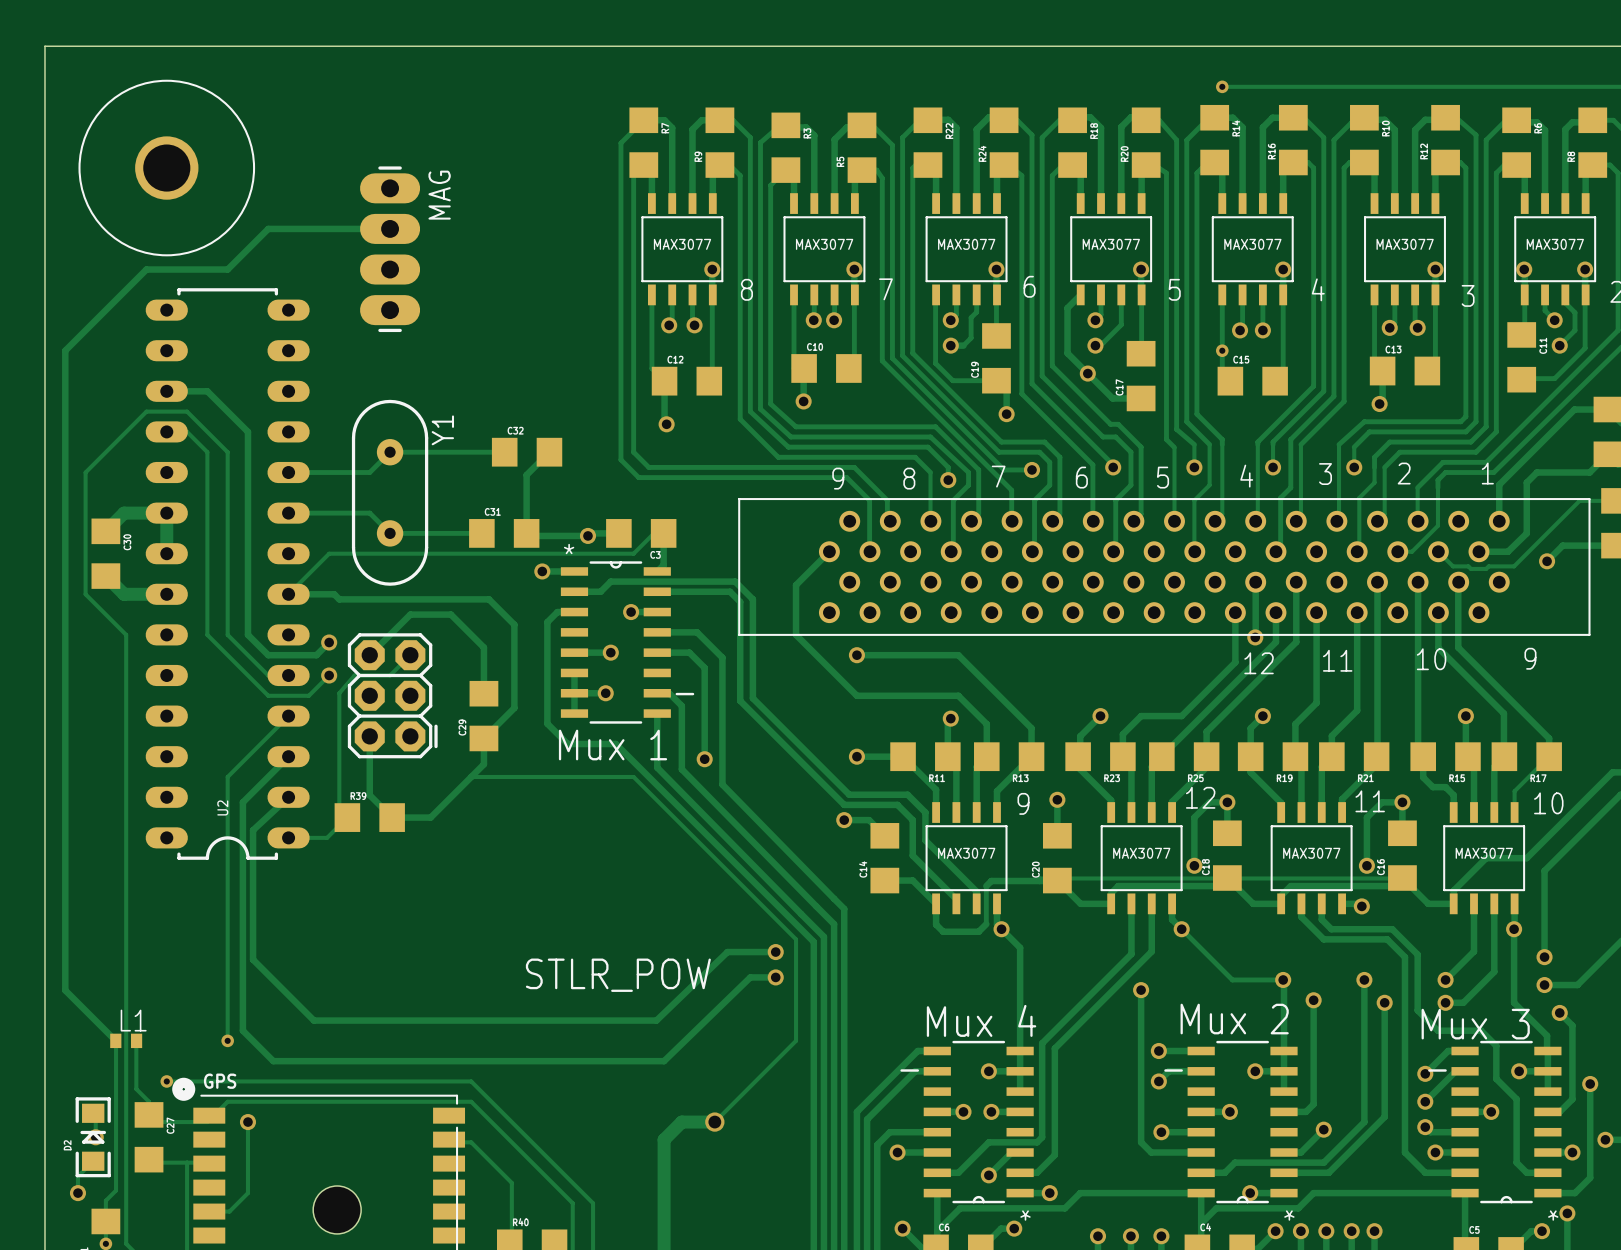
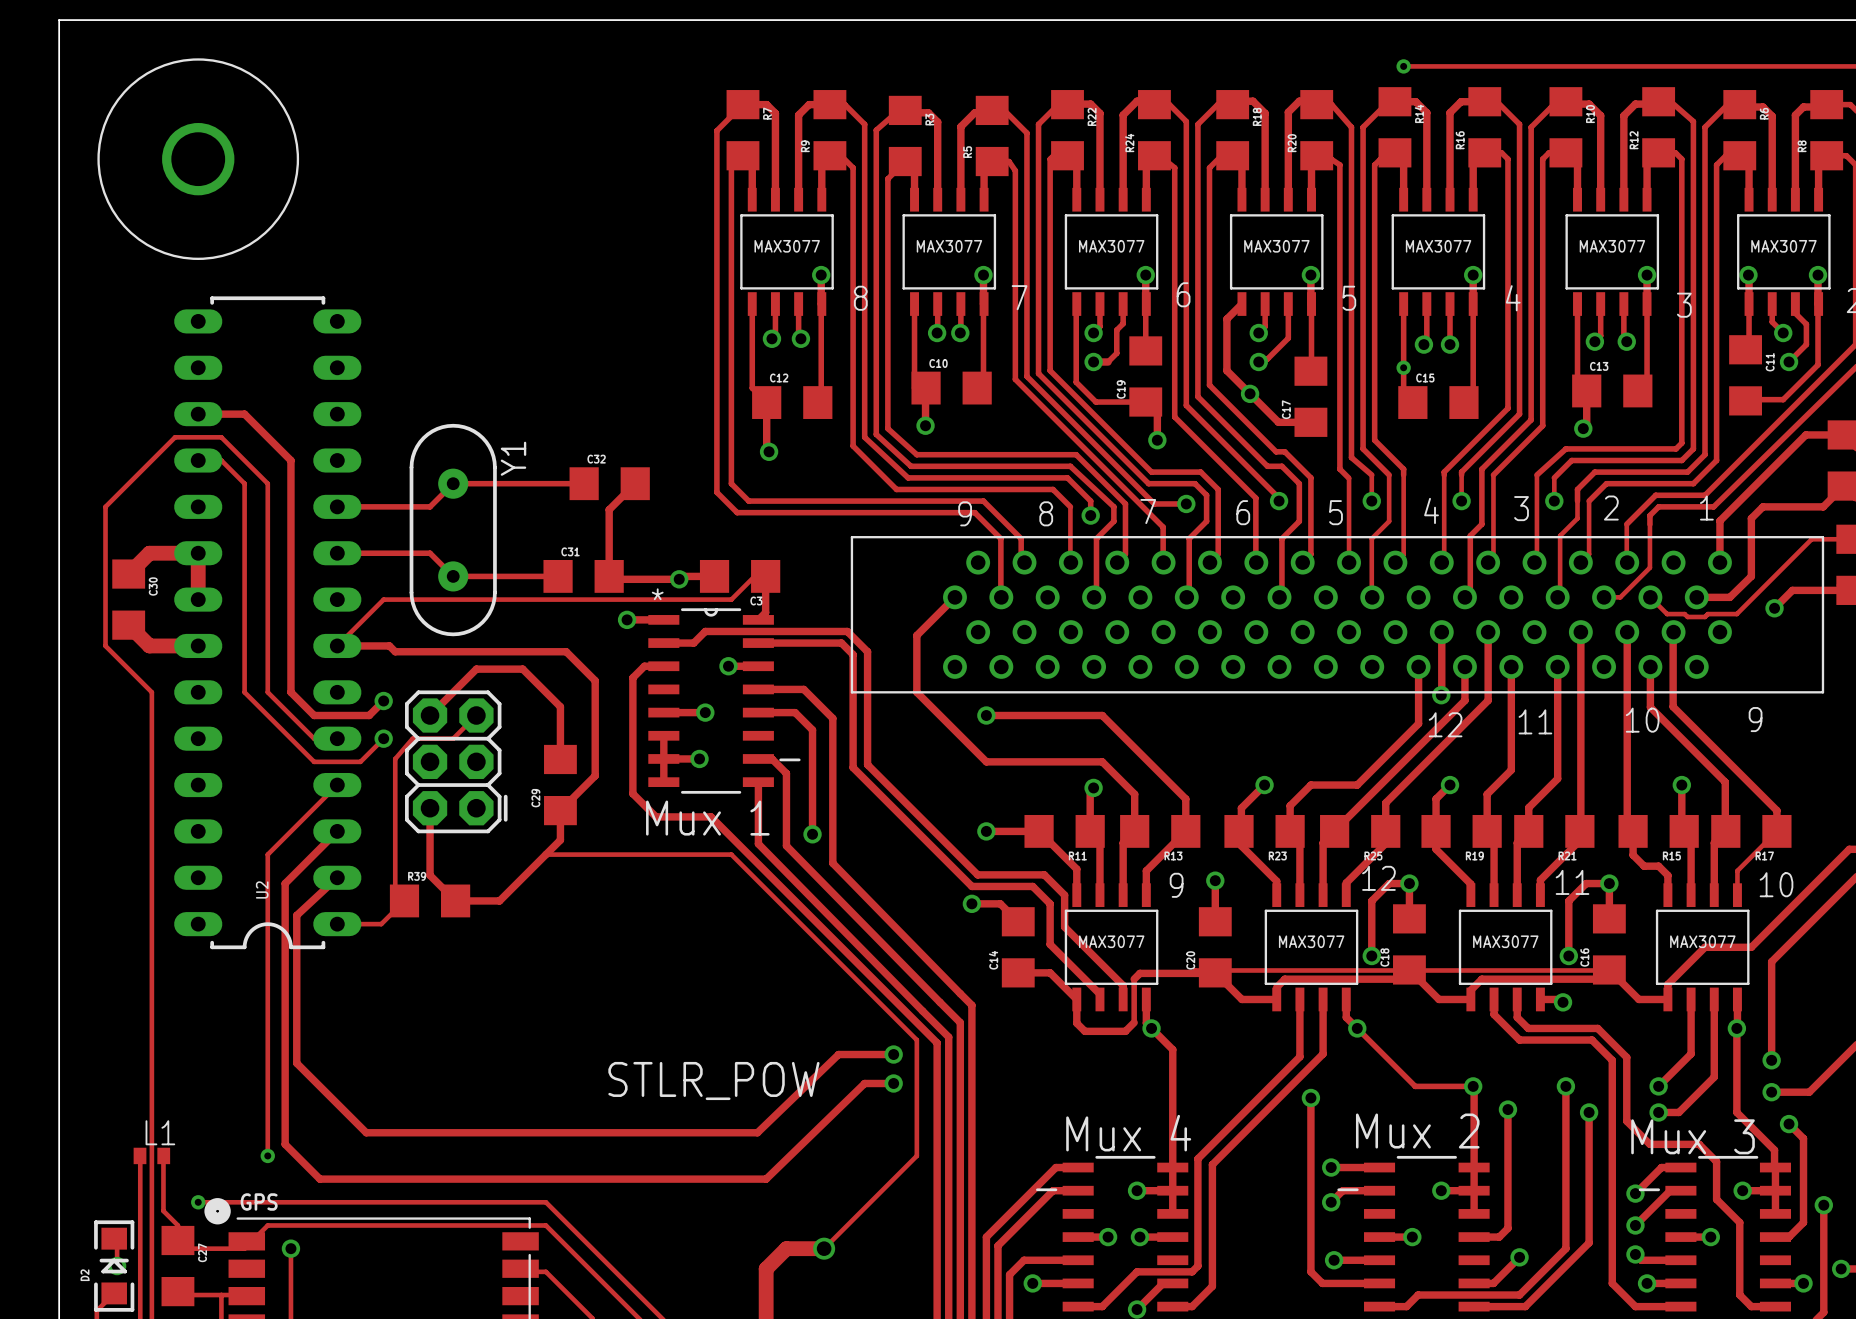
track: (390, 228) (268, 228) (227, 269) (146, 269) (65, 350) (65, 990) (115, 1040) -> none
MAG: (390, 249) -> none

